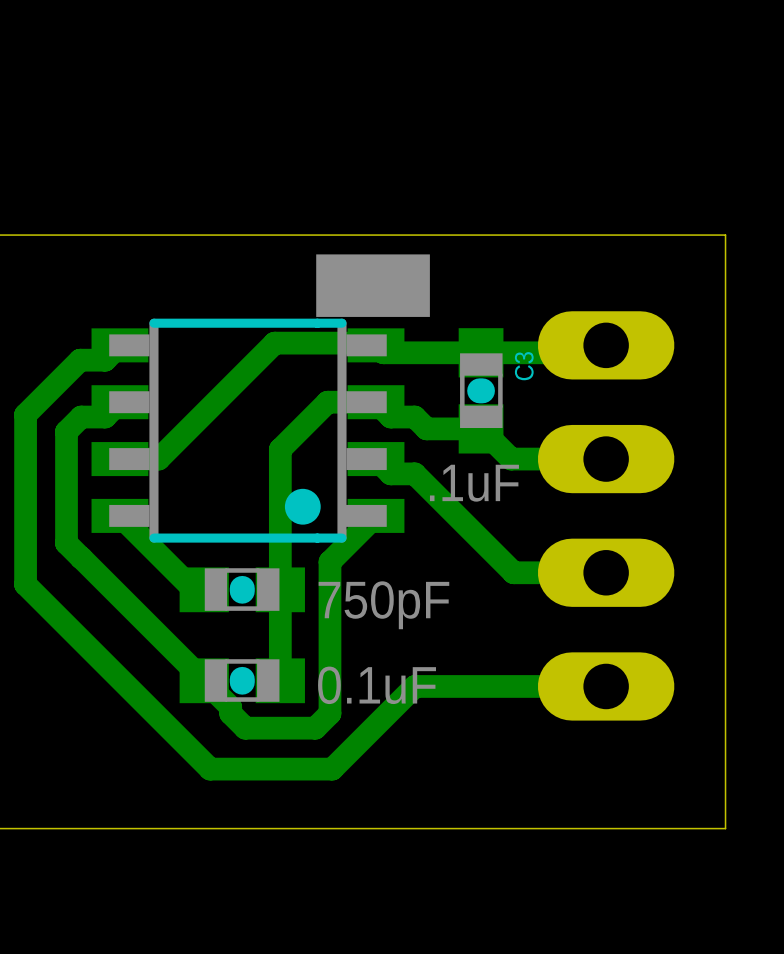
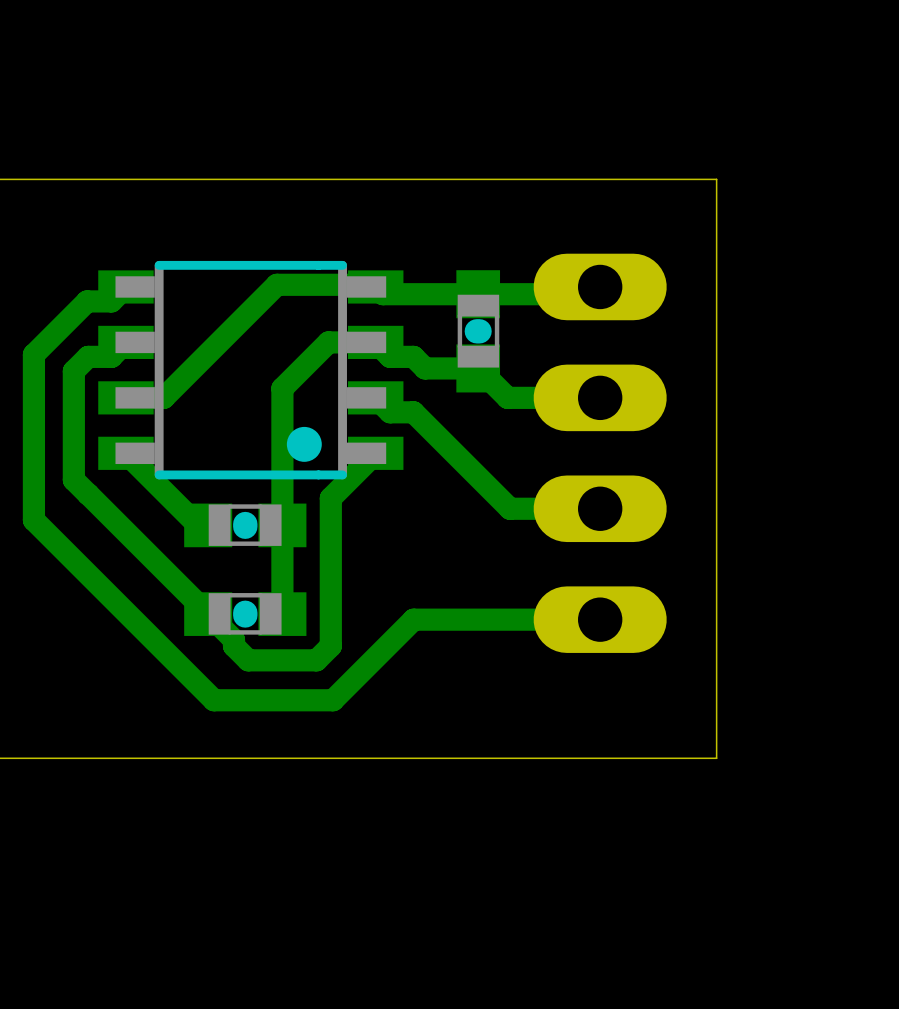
drawing: [316, 254, 430, 317] -> none
C3 name: C3 (524, 366) -> none
C3 value: .1uF (474, 483) -> none
part value: 750pF (383, 605) -> none
part value: 0.1uF (377, 685) -> none

